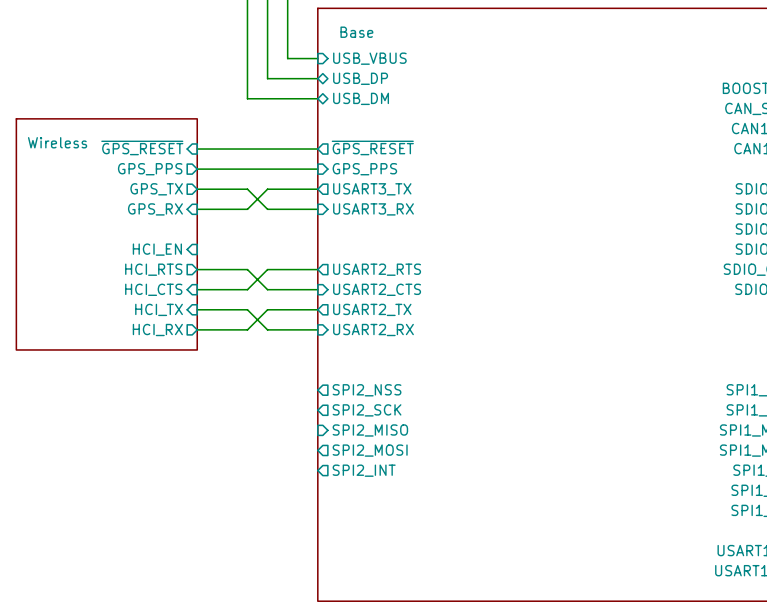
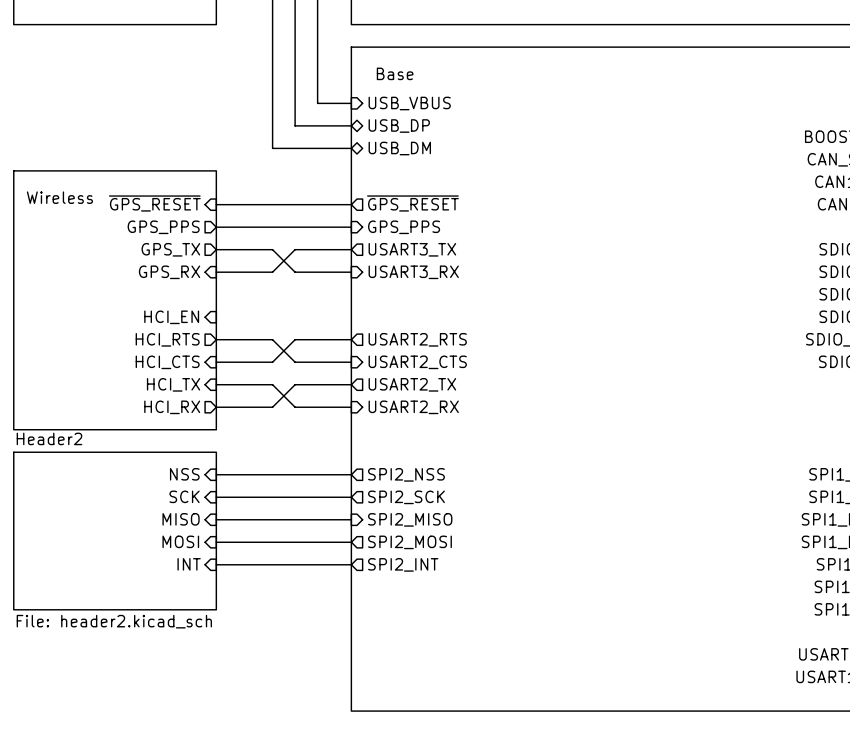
sheet pin: none -> NSS (184, 474)
wire: none -> (216, 474) (351, 474)
sheet pin: none -> SCK (184, 496)
wire: none -> (216, 497) (351, 497)
sheet pin: none -> MISO (181, 519)
wire: none -> (216, 519) (351, 519)
sheet Header2: none -> File: header2.kicad_sch (115, 531)
sheet pin: none -> MOSI (180, 541)
wire: none -> (216, 542) (351, 542)
sheet pin: none -> INT (189, 564)
wire: none -> (216, 564) (351, 564)

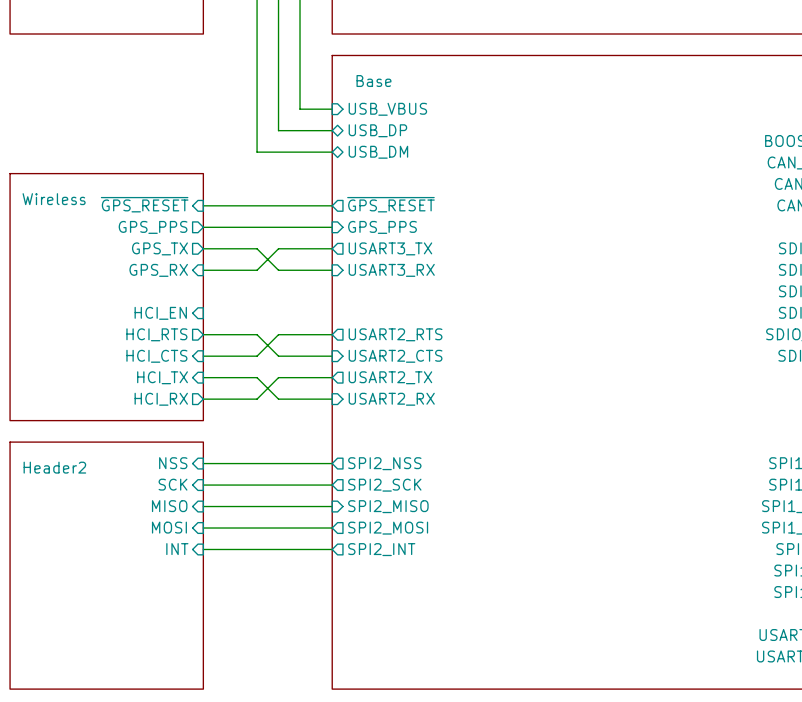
sheet Header2 shape: [13, 451, 218, 611] -> [9, 441, 204, 690]
sheet Header2 value: File: header2.kicad_sch (114, 621) -> none

